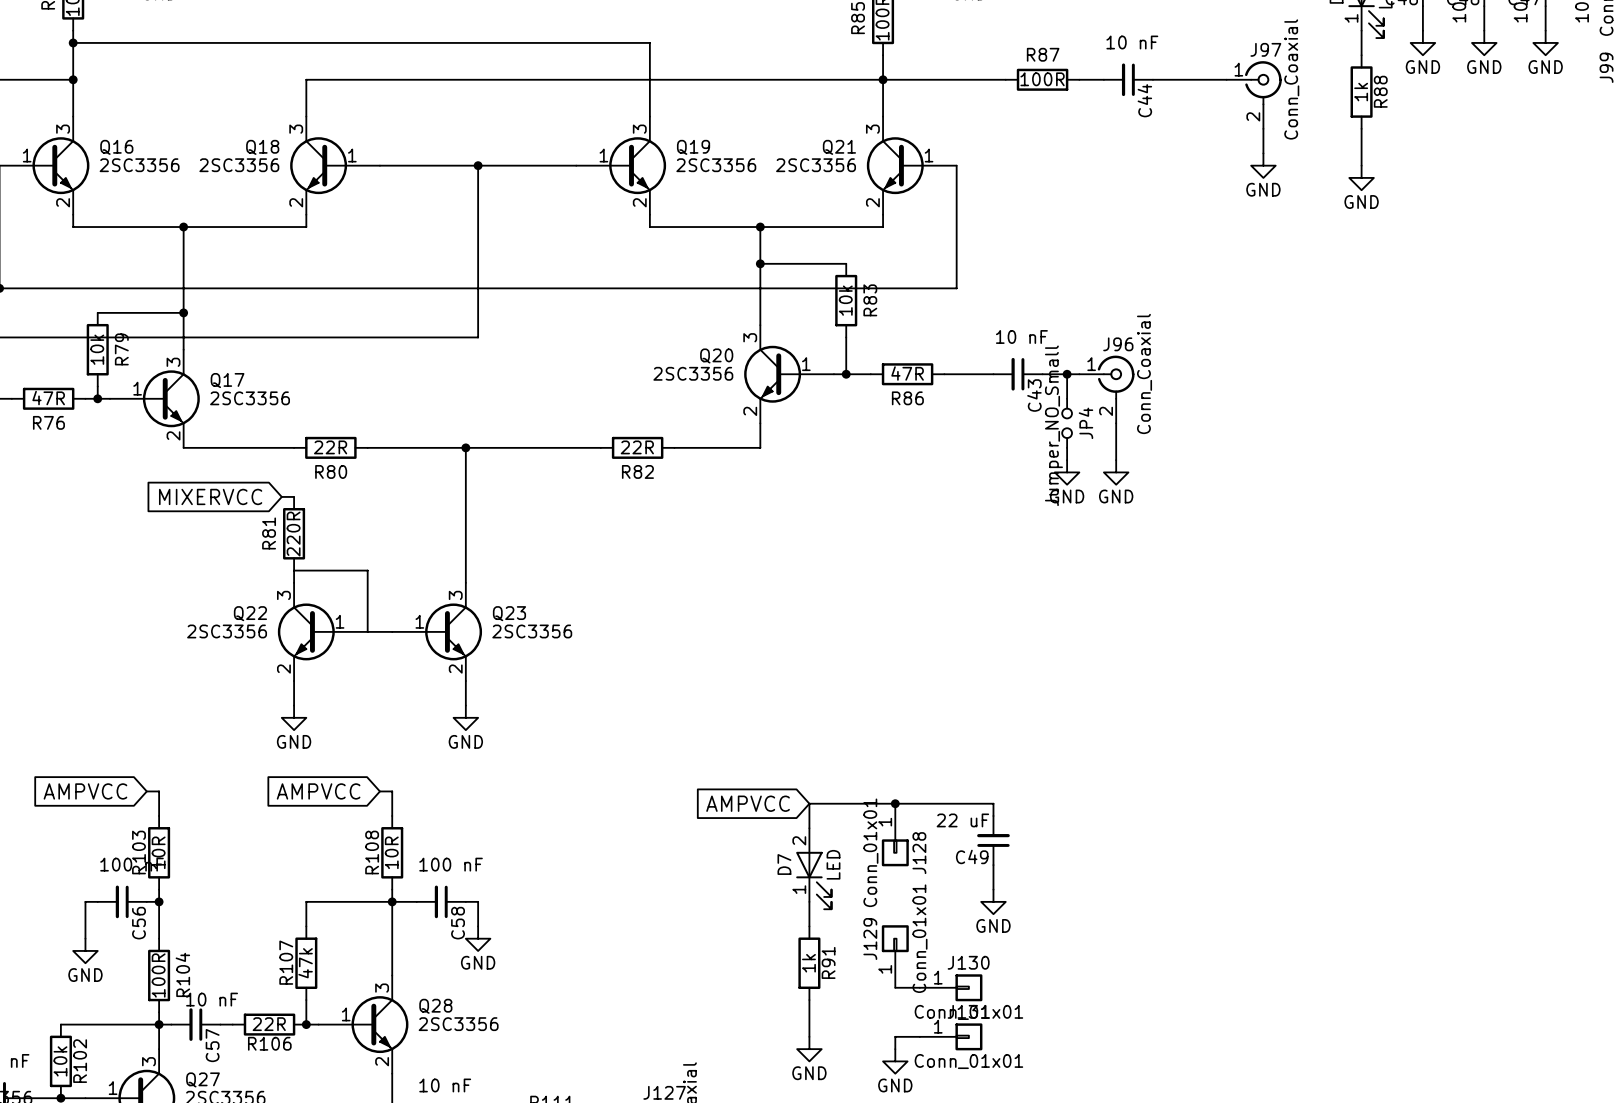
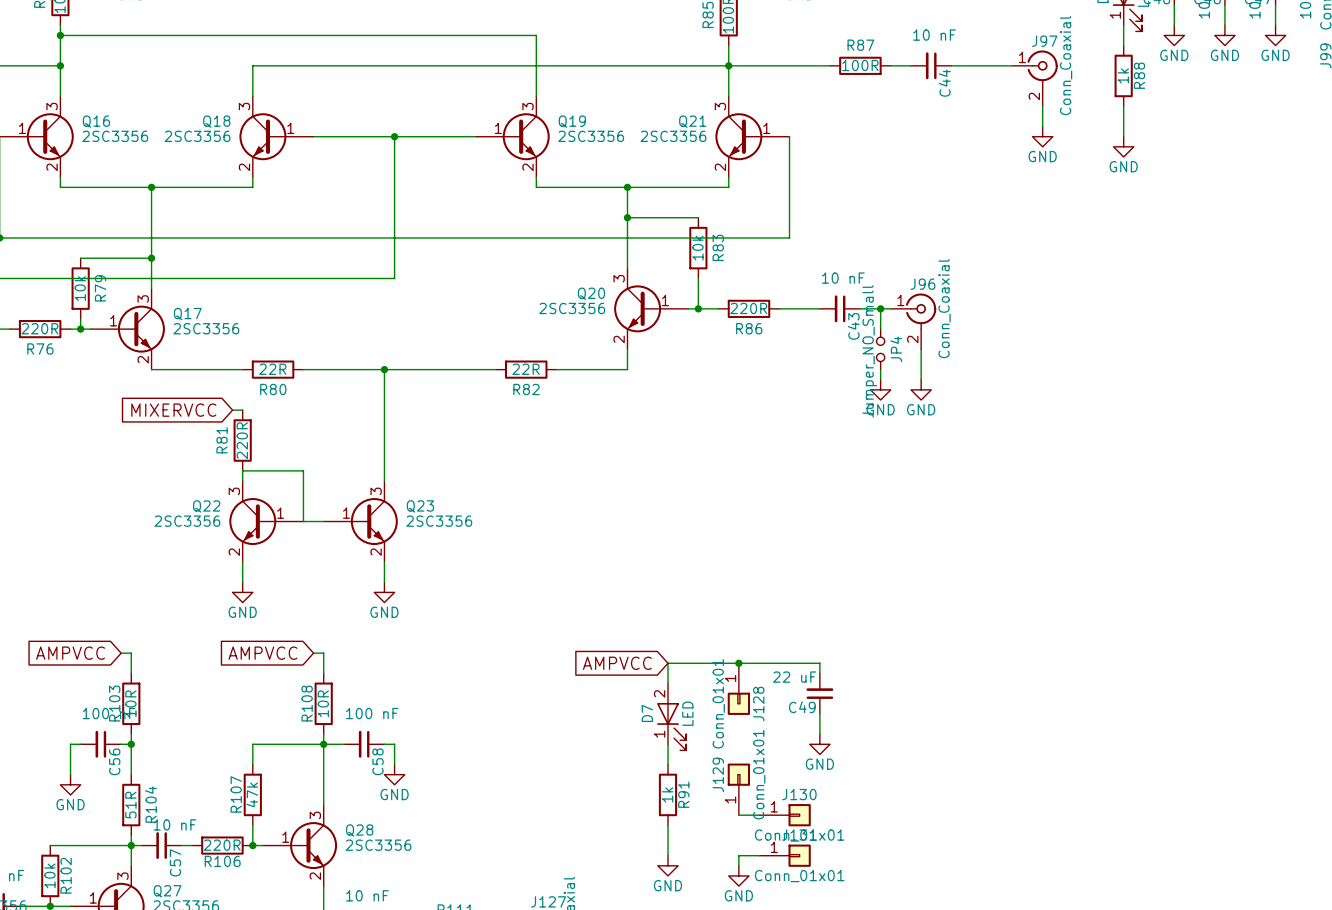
R86 value: 47R (907, 373) -> 220R (748, 308)
R76 value: 47R (48, 398) -> 220R (39, 328)
R104 value: 100R (158, 975) -> 51R (130, 805)
R106 value: 22R (269, 1024) -> 220R (222, 845)

